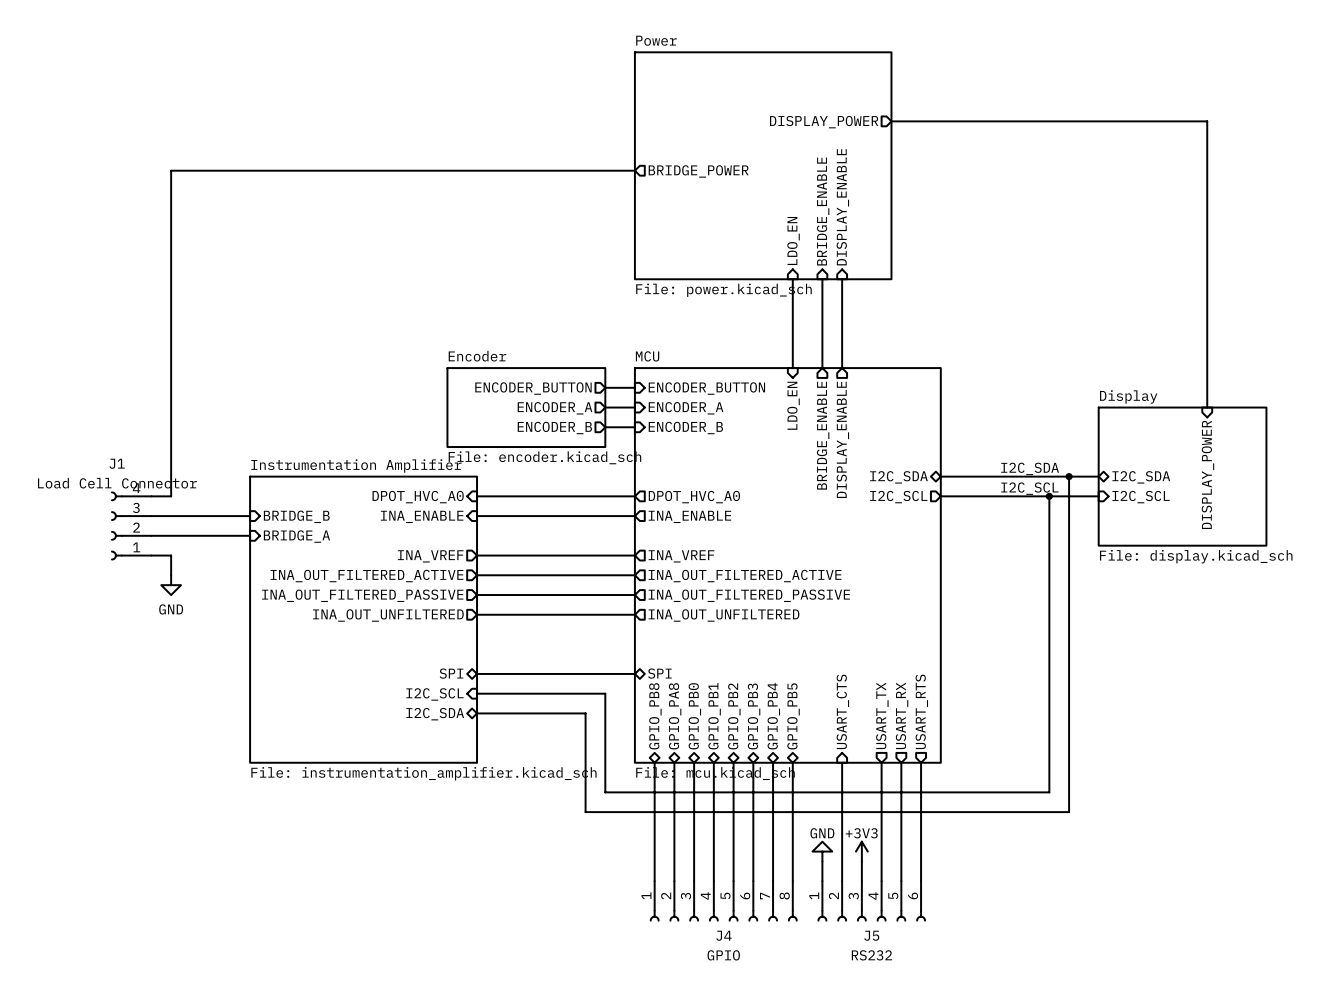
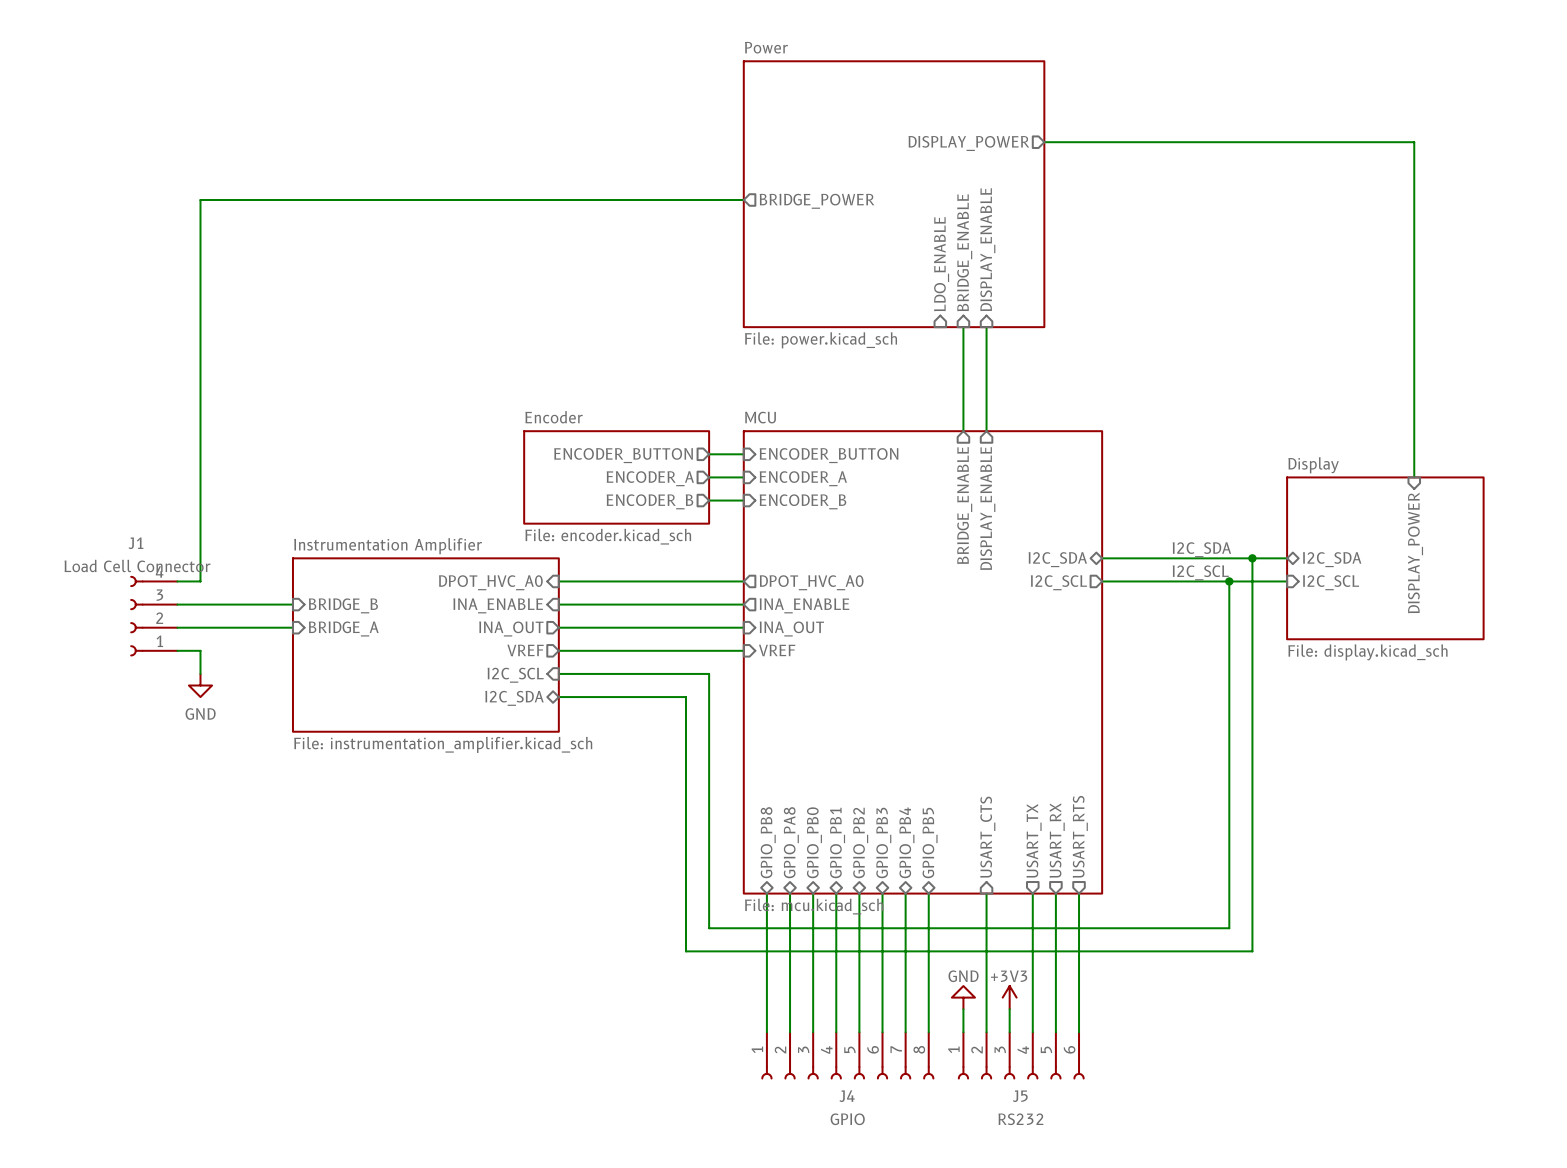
sheet pin: LDO_EN (793, 241) -> LDO_ENABLE (941, 264)
wire: (792, 279) (792, 368) -> none
sheet pin: LDO_EN (793, 405) -> none
sheet pin: none -> INA_OUT (511, 629)
sheet pin: none -> INA_OUT (791, 629)
sheet Instrumentation Amplifier: none -> File: instrumentation_amplifier.kicad_sch (425, 645)
sheet pin: INA_VREF (430, 556) -> VREF (525, 650)
sheet pin shape: output (681, 556) -> input (777, 650)
sheet pin: INA_VREF (681, 556) -> VREF (777, 650)
wire: (605, 575) (634, 575) -> (709, 673) (709, 812)
sheet pin shape: output (366, 576) -> input (515, 675)
sheet pin: INA_OUT_FILTERED_ACTIVE (366, 576) -> I2C_SCL (515, 675)
sheet pin: INA_OUT_FILTERED_ACTIVE (745, 576) -> none
sheet pin shape: output (362, 595) -> bidirectional (514, 698)
sheet pin: INA_OUT_FILTERED_PASSIVE (362, 595) -> I2C_SDA (514, 698)
wire: (585, 595) (634, 595) -> (686, 697) (686, 835)
sheet pin: INA_OUT_FILTERED_PASSIVE (749, 595) -> none
wire: (477, 614) (634, 614) -> (558, 627) (743, 627)
sheet pin: INA_OUT_UNFILTERED (388, 615) -> none
sheet pin: INA_OUT_UNFILTERED (723, 615) -> none
sheet Instrumentation Amplifier: File: instrumentation_amplifier.kicad_sch (363, 619) -> none
sheet pin: SPI (451, 673) -> none
bus: (477, 673) (634, 673) -> none
sheet pin: SPI (659, 673) -> none
wire: (477, 693) (605, 693) -> none
sheet pin: I2C_SCL (434, 694) -> none
wire: (477, 713) (585, 713) -> none
sheet pin: I2C_SDA (435, 714) -> none

